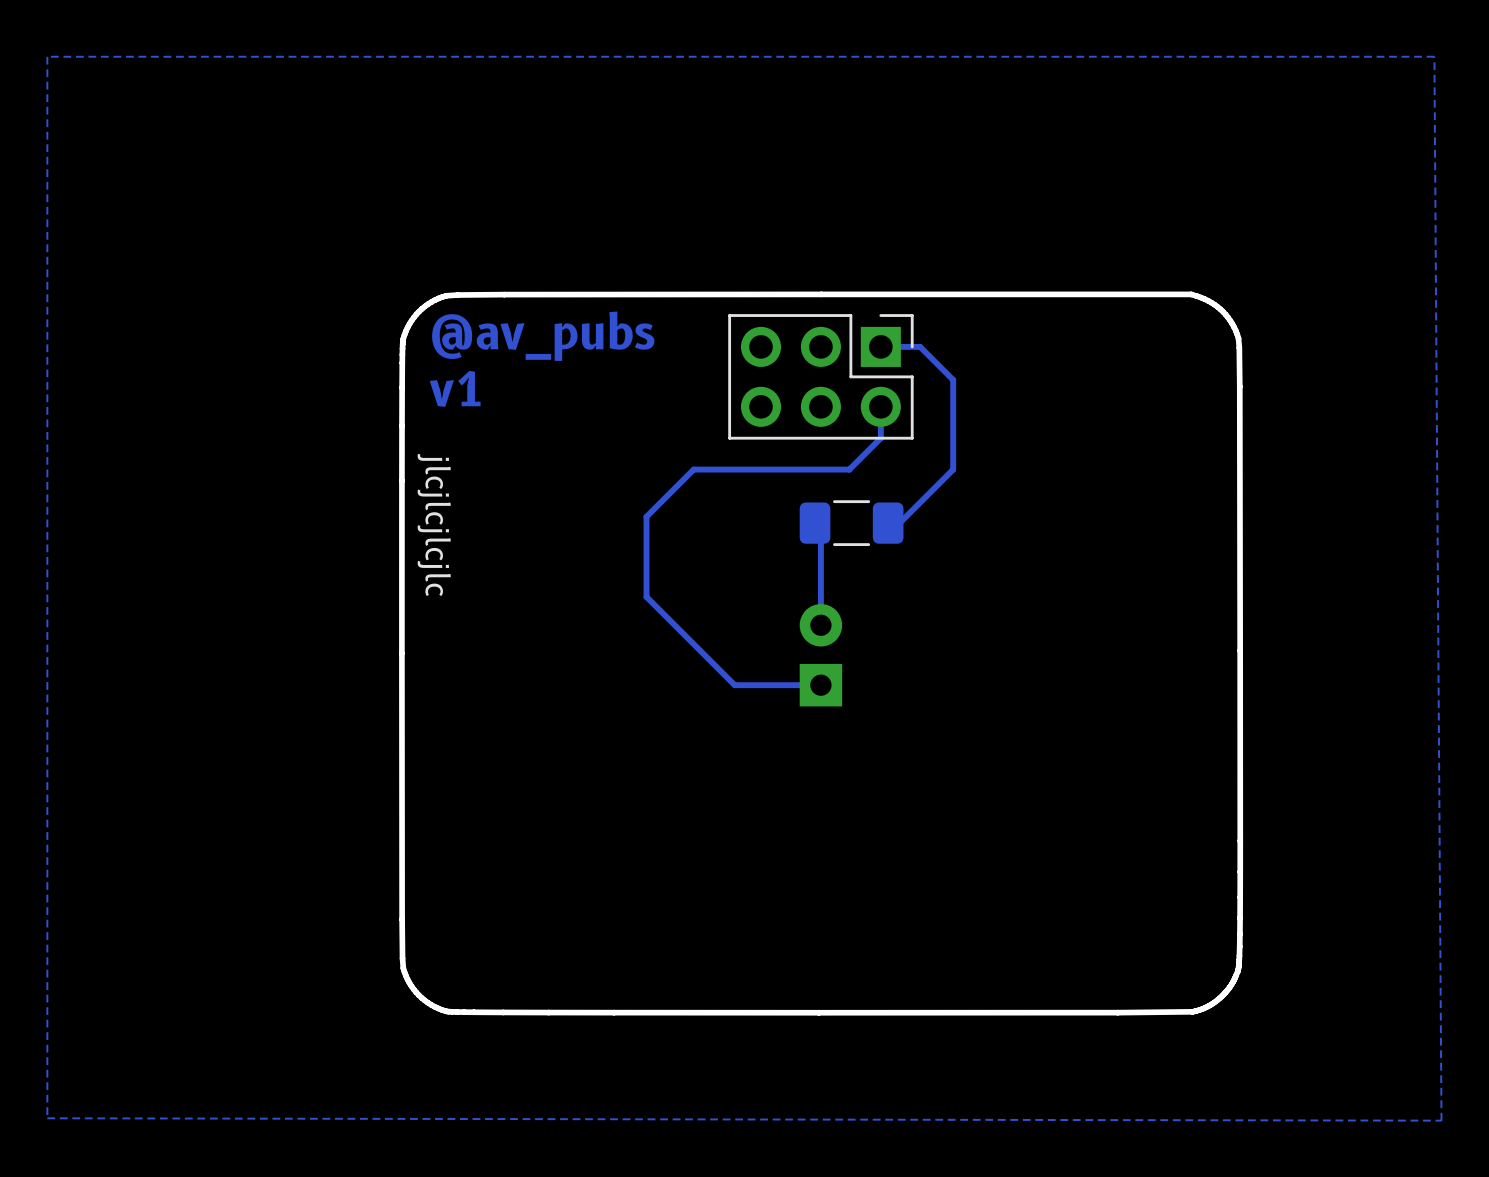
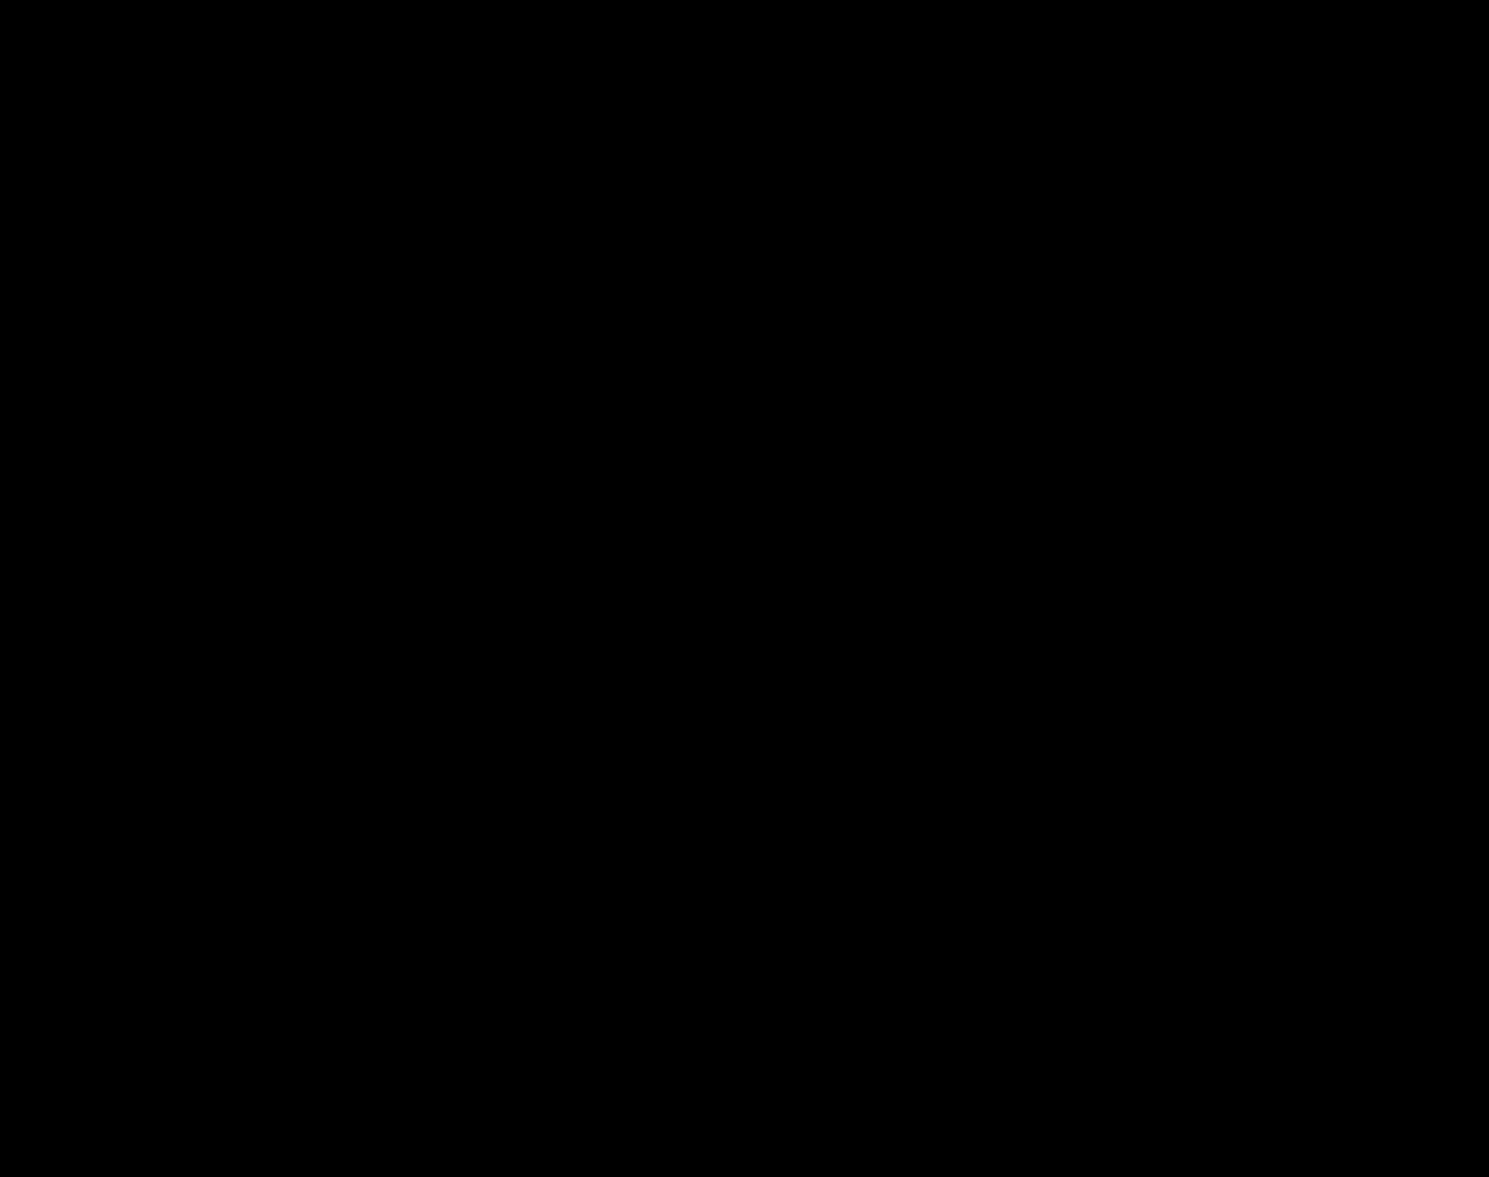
zone outline: (1434, 56) (1441, 1120) (47, 1118) (47, 56) (1434, 56) -> none
board edge: (1191, 294) (1211, 302) (1225, 314) (1235, 330) (1239, 347) (1239, 955) (1238, 969) (1234, 978) (1219, 998) (1206, 1007) (1192, 1011) (473, 1012) (441, 1009) (427, 1002) (416, 992) (405, 975) (402, 958) (402, 362) (404, 334) (411, 320) (422, 308) (438, 298) (457, 295) (1191, 294) -> none
text: @av_pubs (543, 336) -> none
track: (880, 346) (920, 346) (953, 379) (953, 469) (899, 523) (888, 523) -> none
part: (820, 376) -> none
text: v1 (455, 388) -> none
track: (880, 406) (880, 438) (849, 469) (693, 469) (646, 516) (646, 596) (734, 685) (820, 685) -> none
track: (815, 523) (820, 529) (820, 625) -> none
part: (851, 523) -> none
text: jlcjlcjlcjlc (434, 524) -> none
part: (820, 655) -> none

